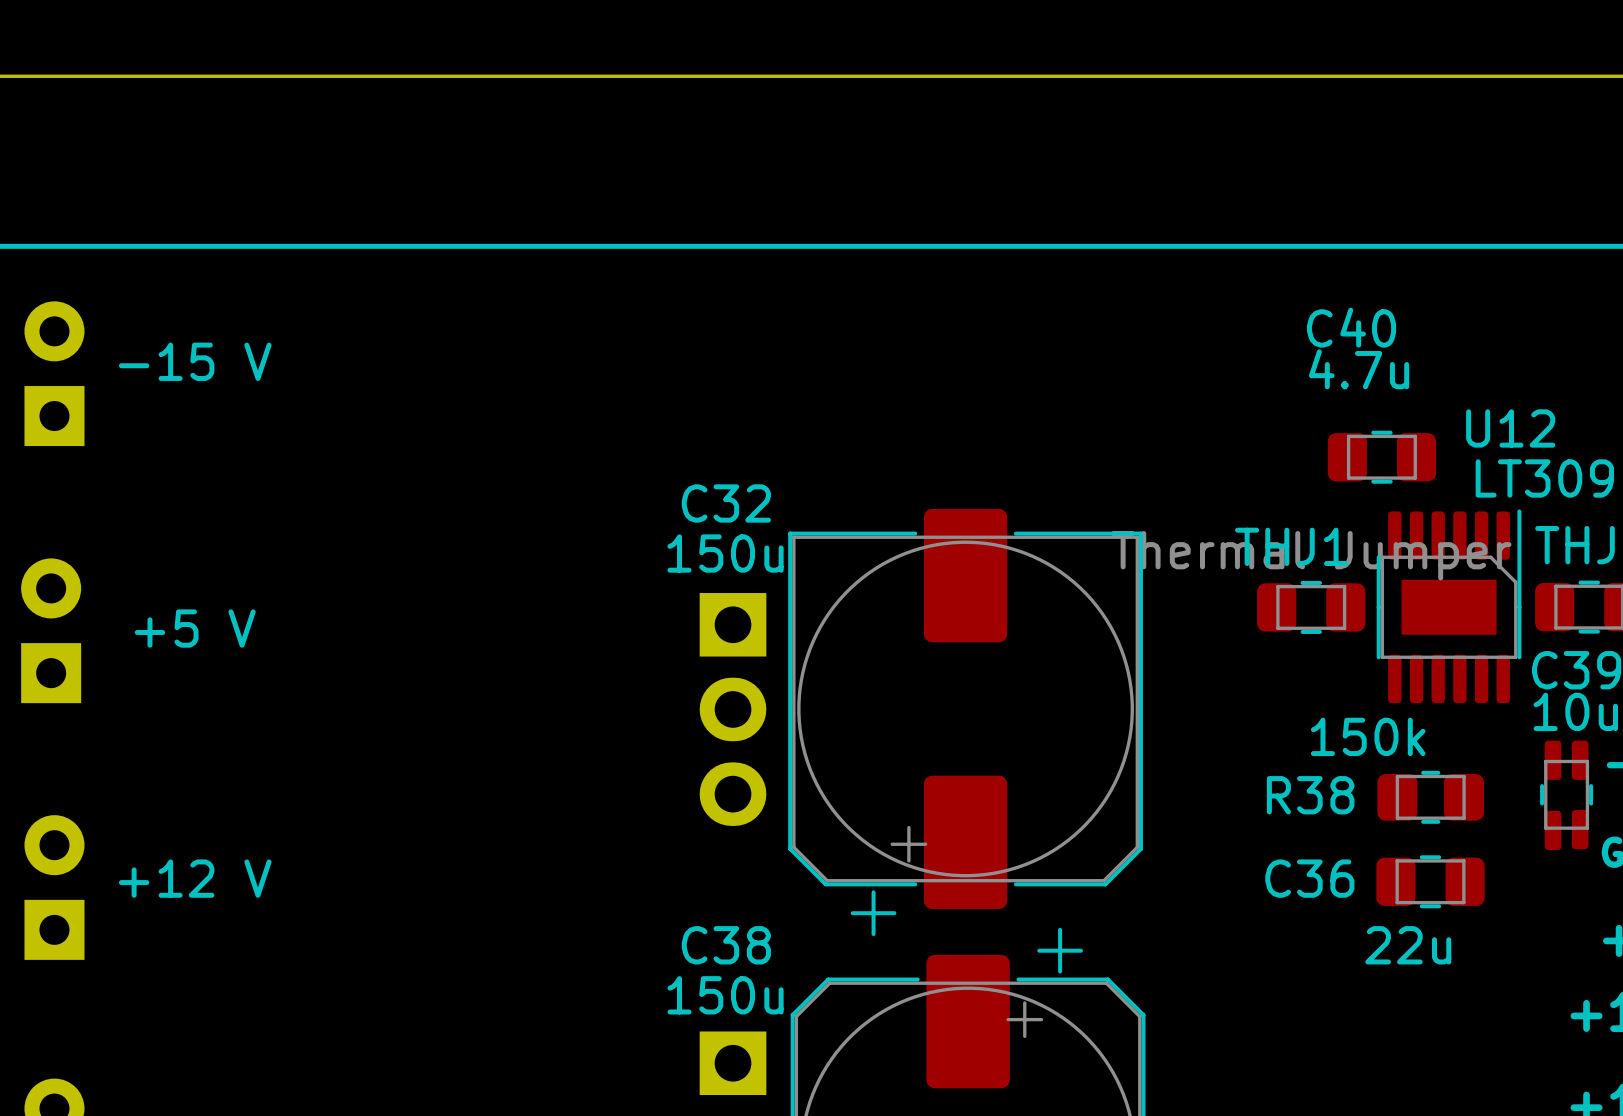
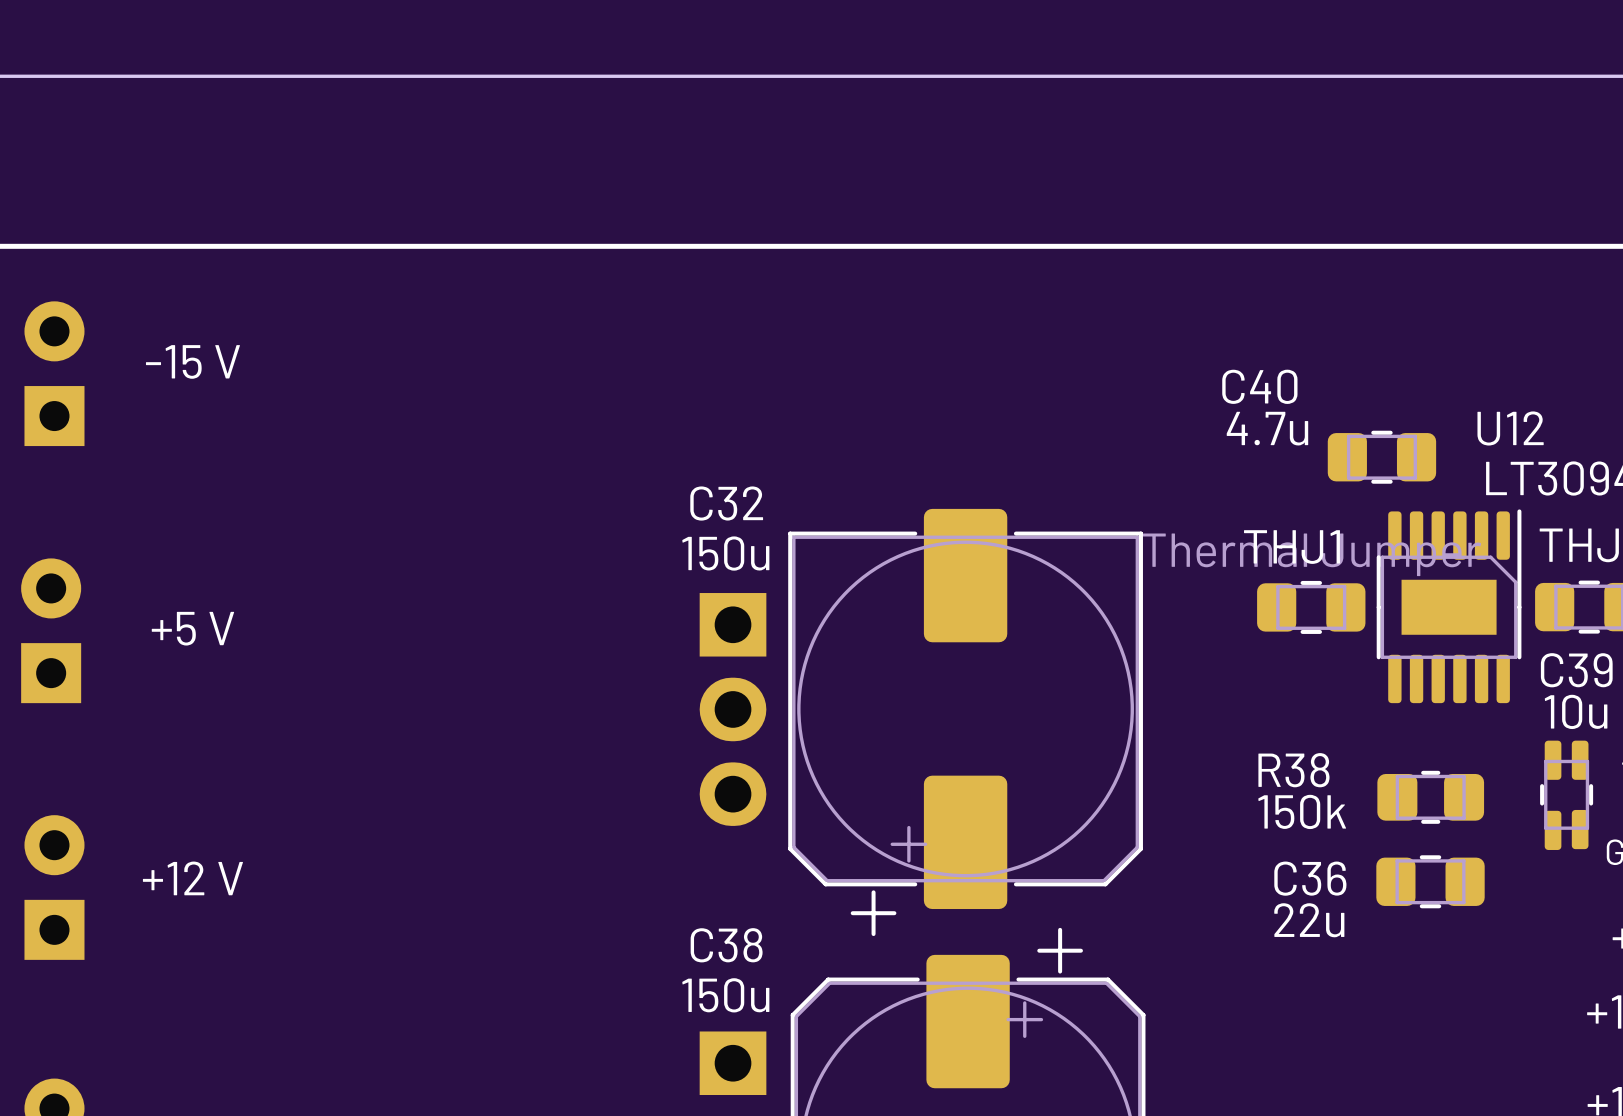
C40 name position: C40 (1351, 327) -> C40 (1259, 386)
C40 value position: 4.7u (1359, 369) -> 4.7u (1267, 428)
R38 value position: 150k (1368, 736) -> 150k (1302, 811)
R38 name position: R38 (1310, 795) -> R38 (1293, 770)
C36 value position: 22u (1408, 945) -> 22u (1309, 920)

